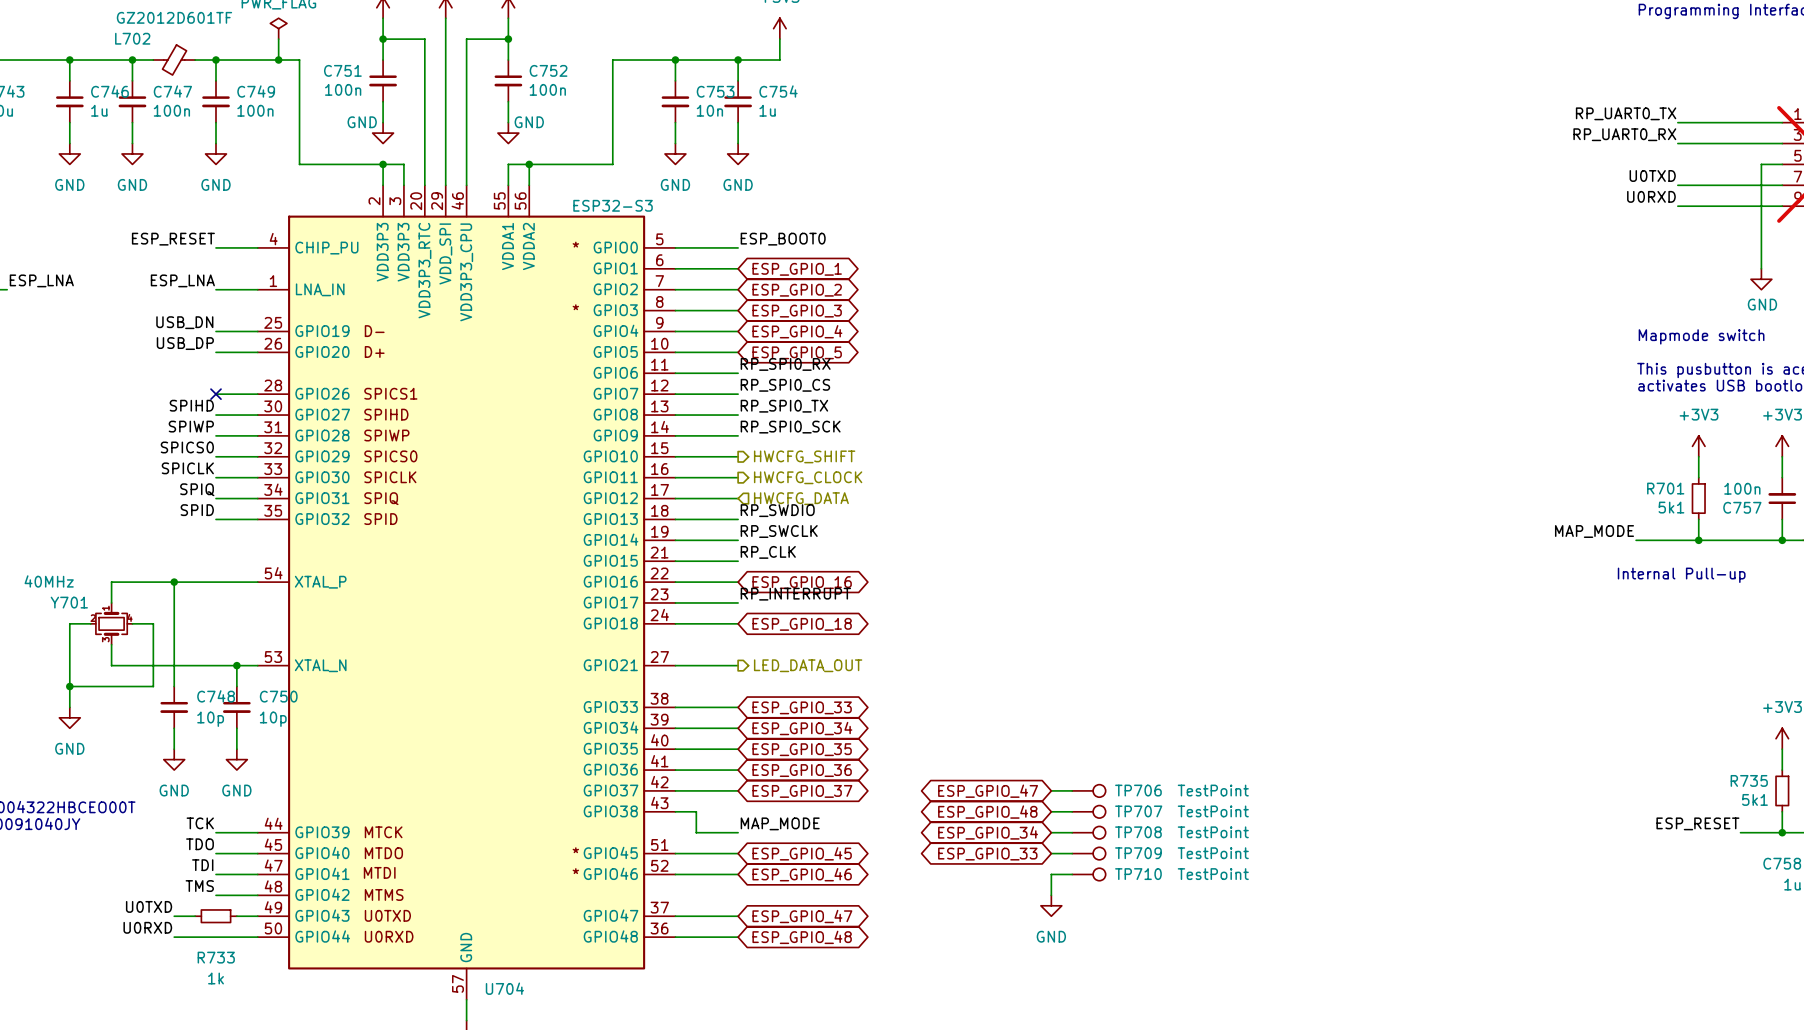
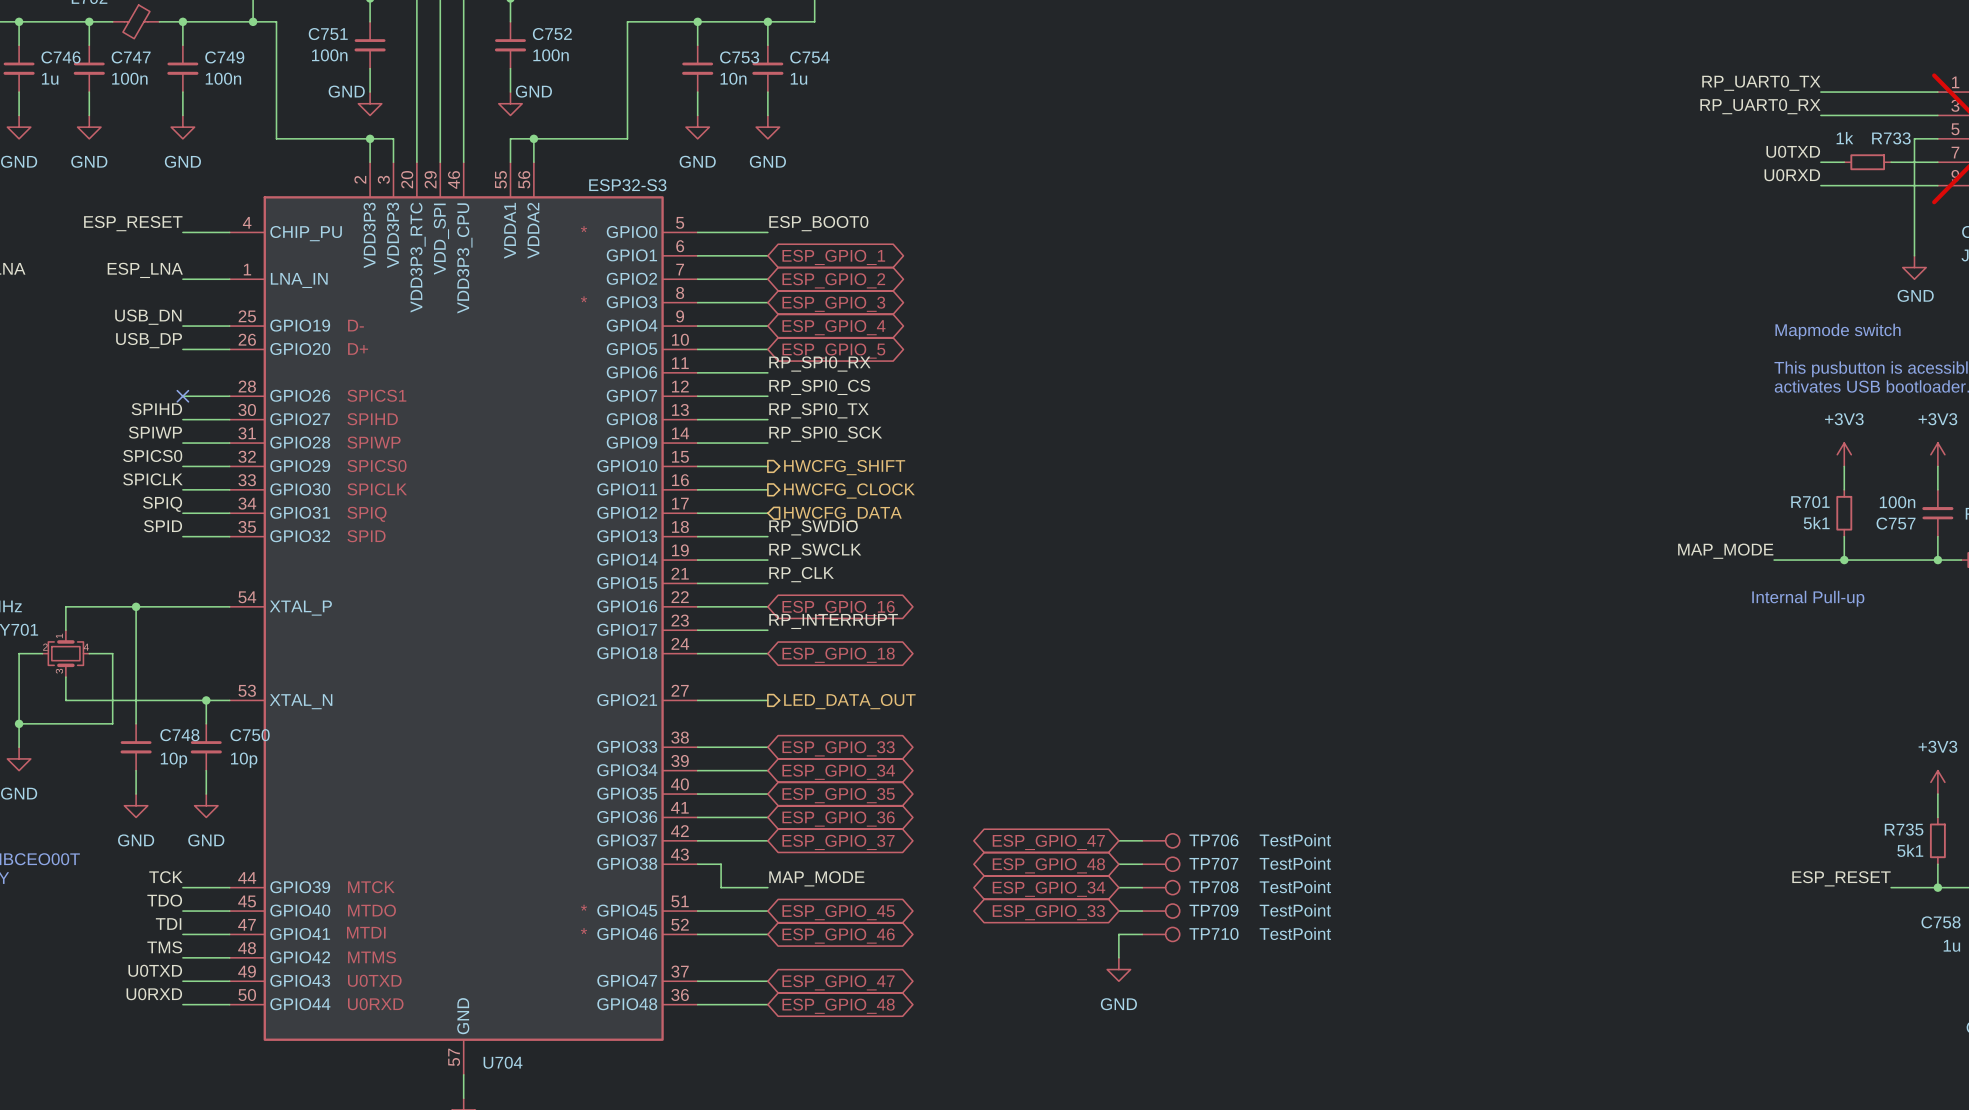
wire: (1698, 185) (1740, 185) -> none
label position: U0TXD (149, 906) -> U0TXD (155, 970)
wire: (174, 916) (195, 916) -> (182, 981) (206, 981)
R733 position: (215, 916) -> (1867, 162)
label position: U0RXD (147, 927) -> U0RXD (154, 994)
wire: (174, 937) (215, 937) -> none
R733 name position: R733 (216, 957) -> R733 (1891, 138)
R733 value position: 1k (215, 978) -> 1k (1844, 138)

